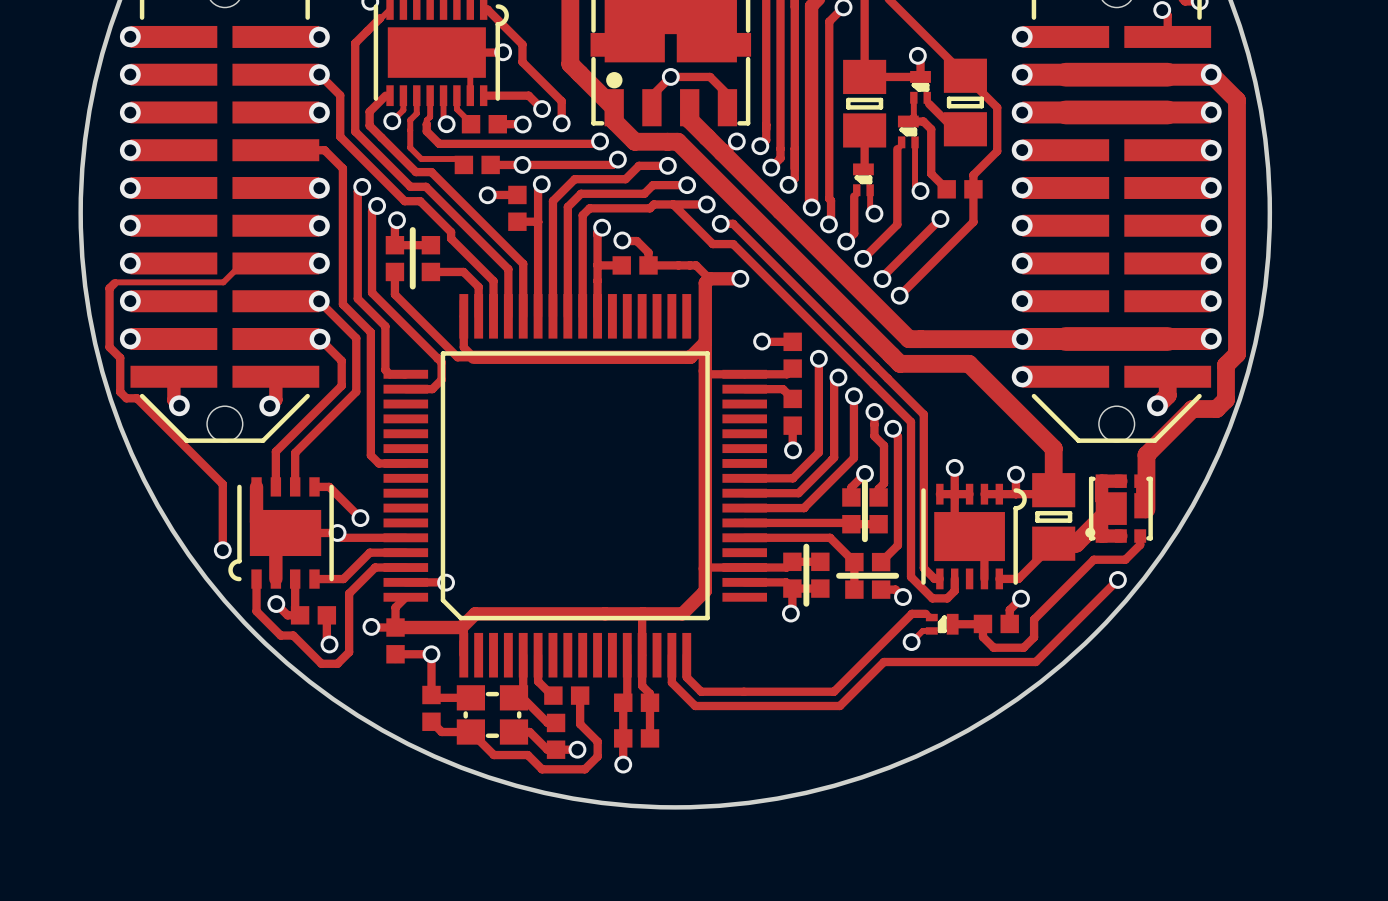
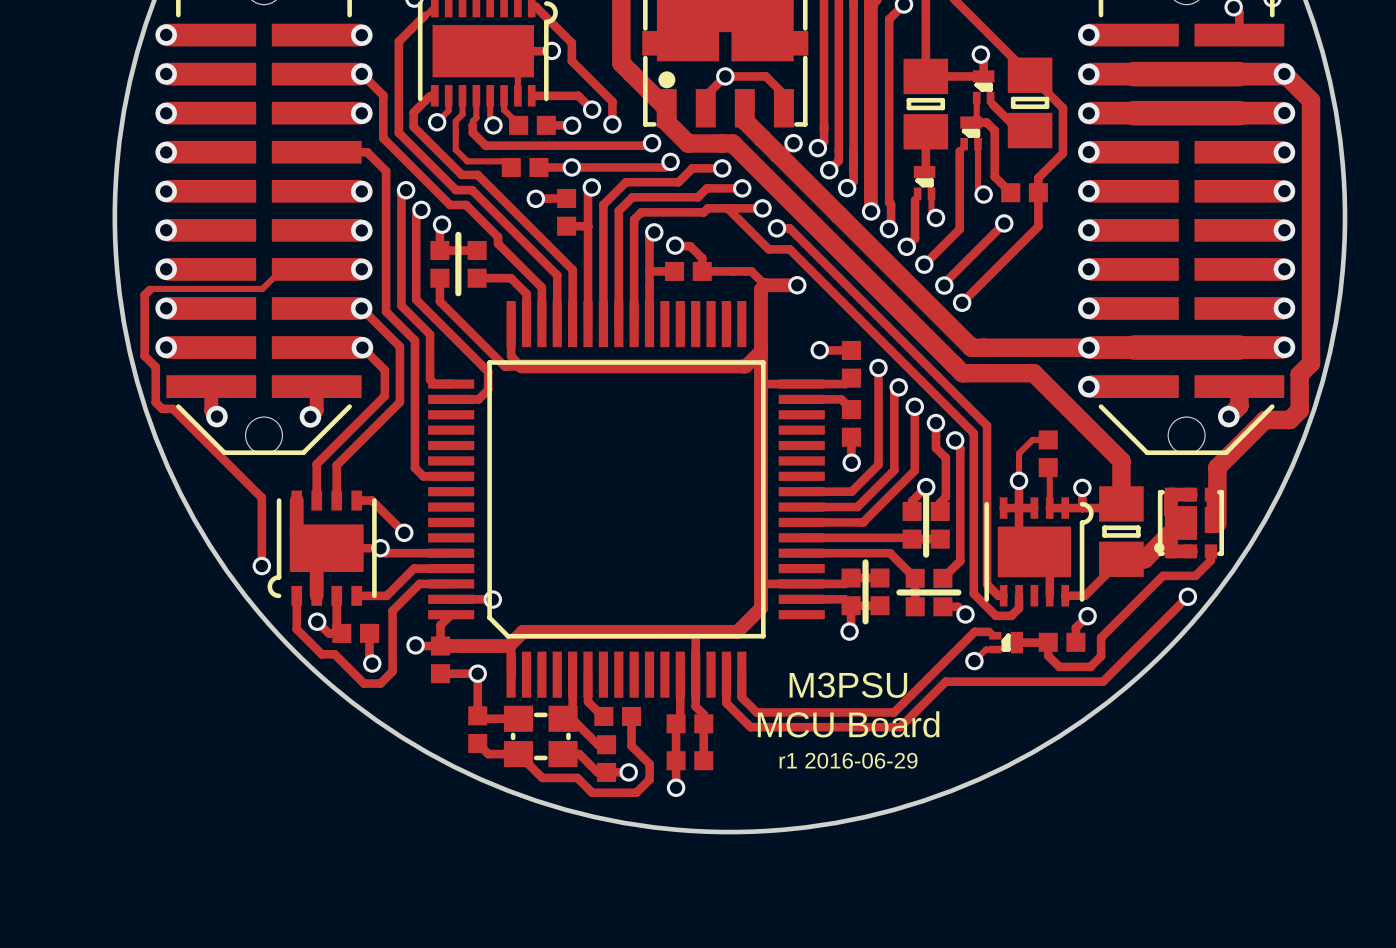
track: none -> (1048, 439) (1032, 439) (1019, 453) (1019, 480)
part: none -> (1048, 453)
track: none -> (1048, 467) (1049, 508)
text: none -> M3PSU (848, 685)
text: none -> MCU Board (848, 724)
text: none -> r1 2016-06-29 (848, 760)

